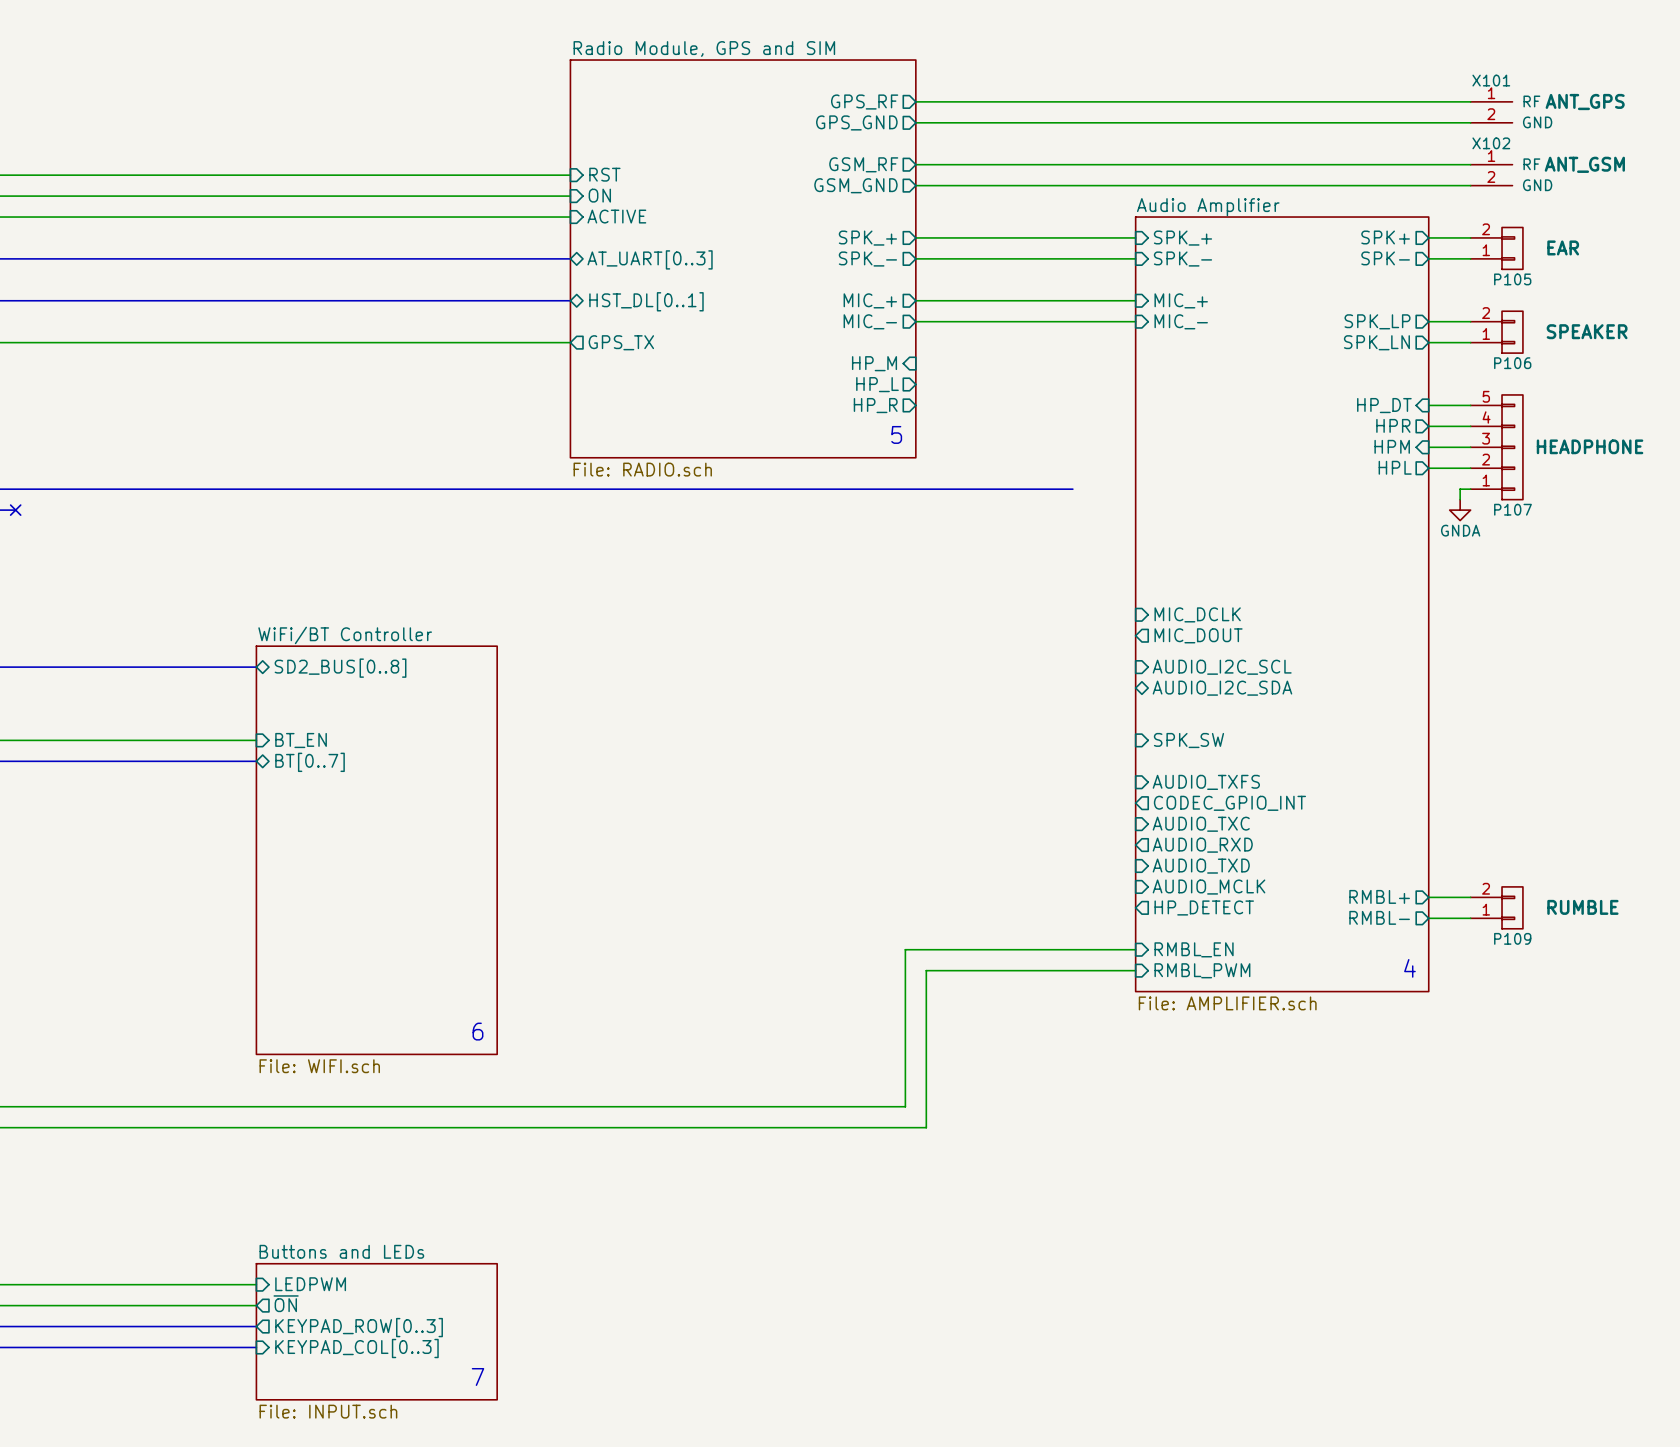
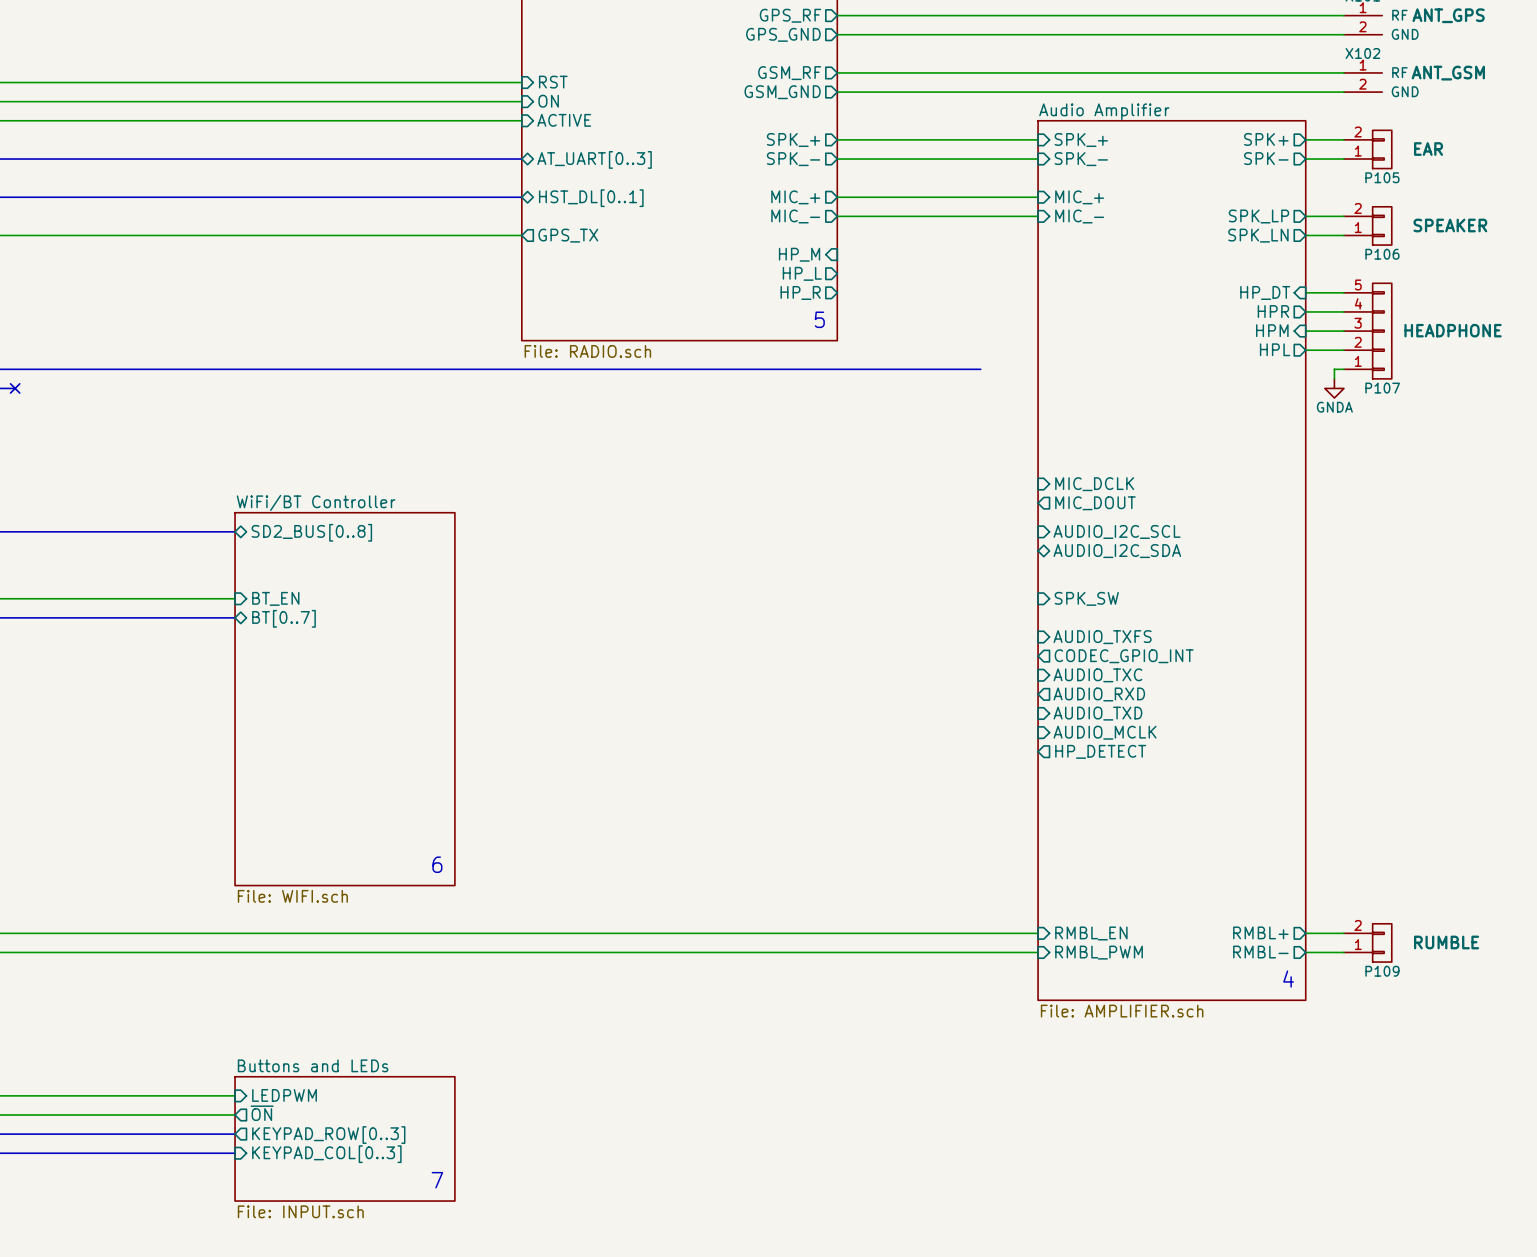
sheet Audio Amplifier: File: AMPLIFIER.sch (1282, 604) -> none
sheet Audio Amplifier: none -> File: AMPLIFIER.sch (1171, 560)
sheet pin: RMBL+ (1379, 896) -> none
wire: (1428, 897) (1470, 897) -> none
P109 position: (1496, 907) -> (1367, 942)
sheet pin: RMBL- (1379, 917) -> none
wire: (1428, 918) (1470, 918) -> (1305, 933) (1343, 933)
wire: (1135, 949) (905, 949) (905, 1106) -> (1038, 933) (827, 933)
sheet pin position: RMBL_EN (1194, 949) -> RMBL_EN (1091, 933)
text position: 4 (1409, 968) -> 4 (1288, 979)
wire: (1135, 970) (926, 970) (926, 1127) -> (1038, 952) (846, 952)
sheet pin position: RMBL_PWM (1202, 970) -> RMBL_PWM (1099, 952)
sheet pin: none -> RMBL+ (1260, 932)
sheet pin: none -> RMBL- (1260, 952)
wire: none -> (1305, 952) (1343, 952)

